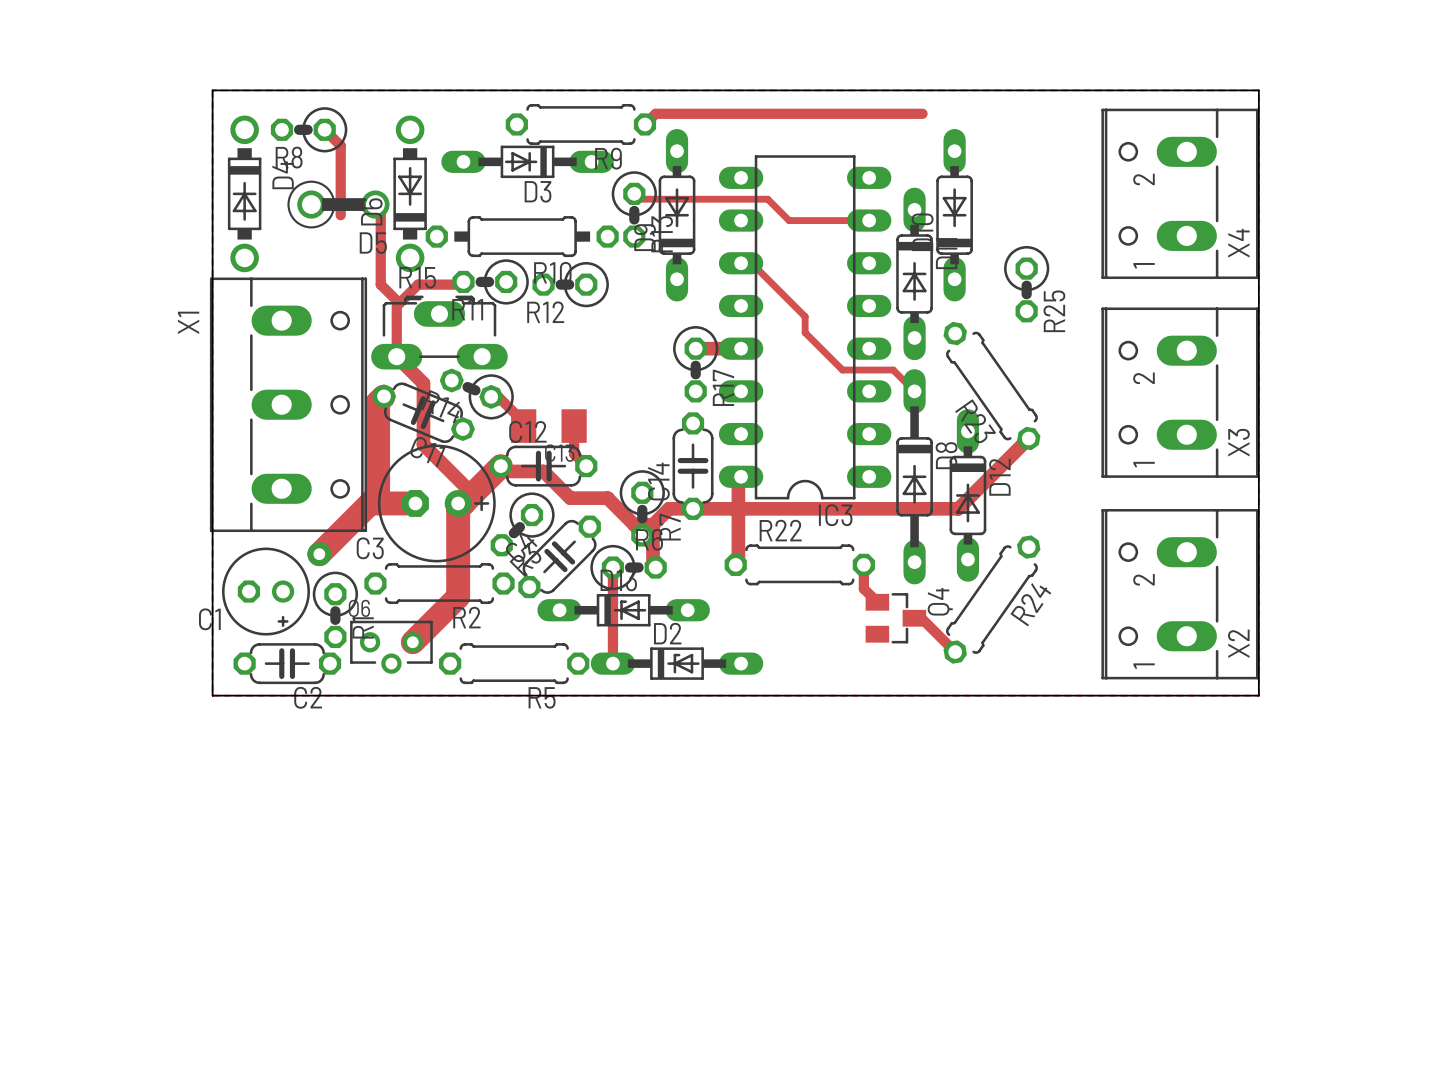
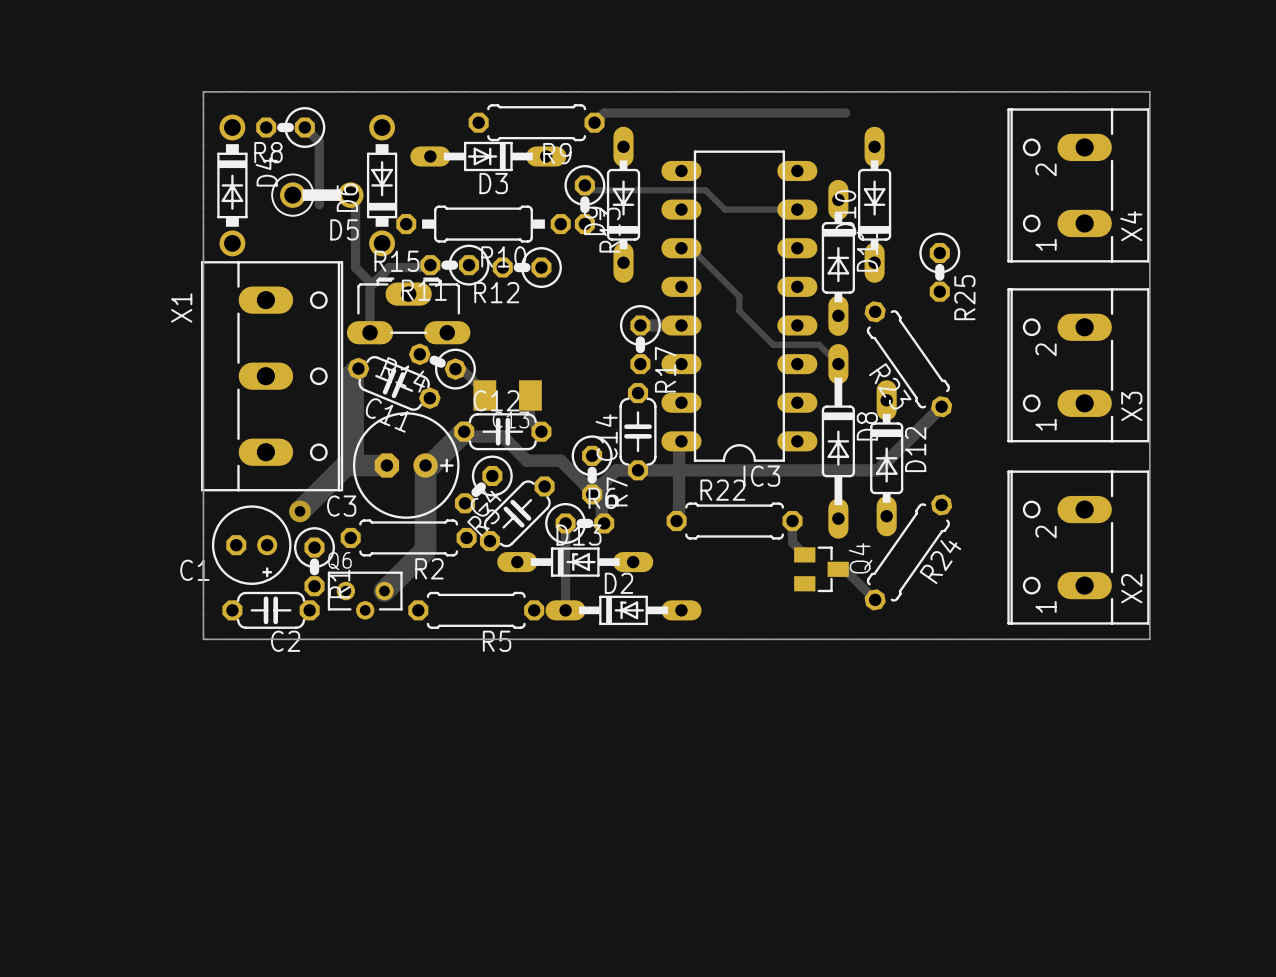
track: (396, 356) (423, 383) (423, 444) (472, 494) -> none

